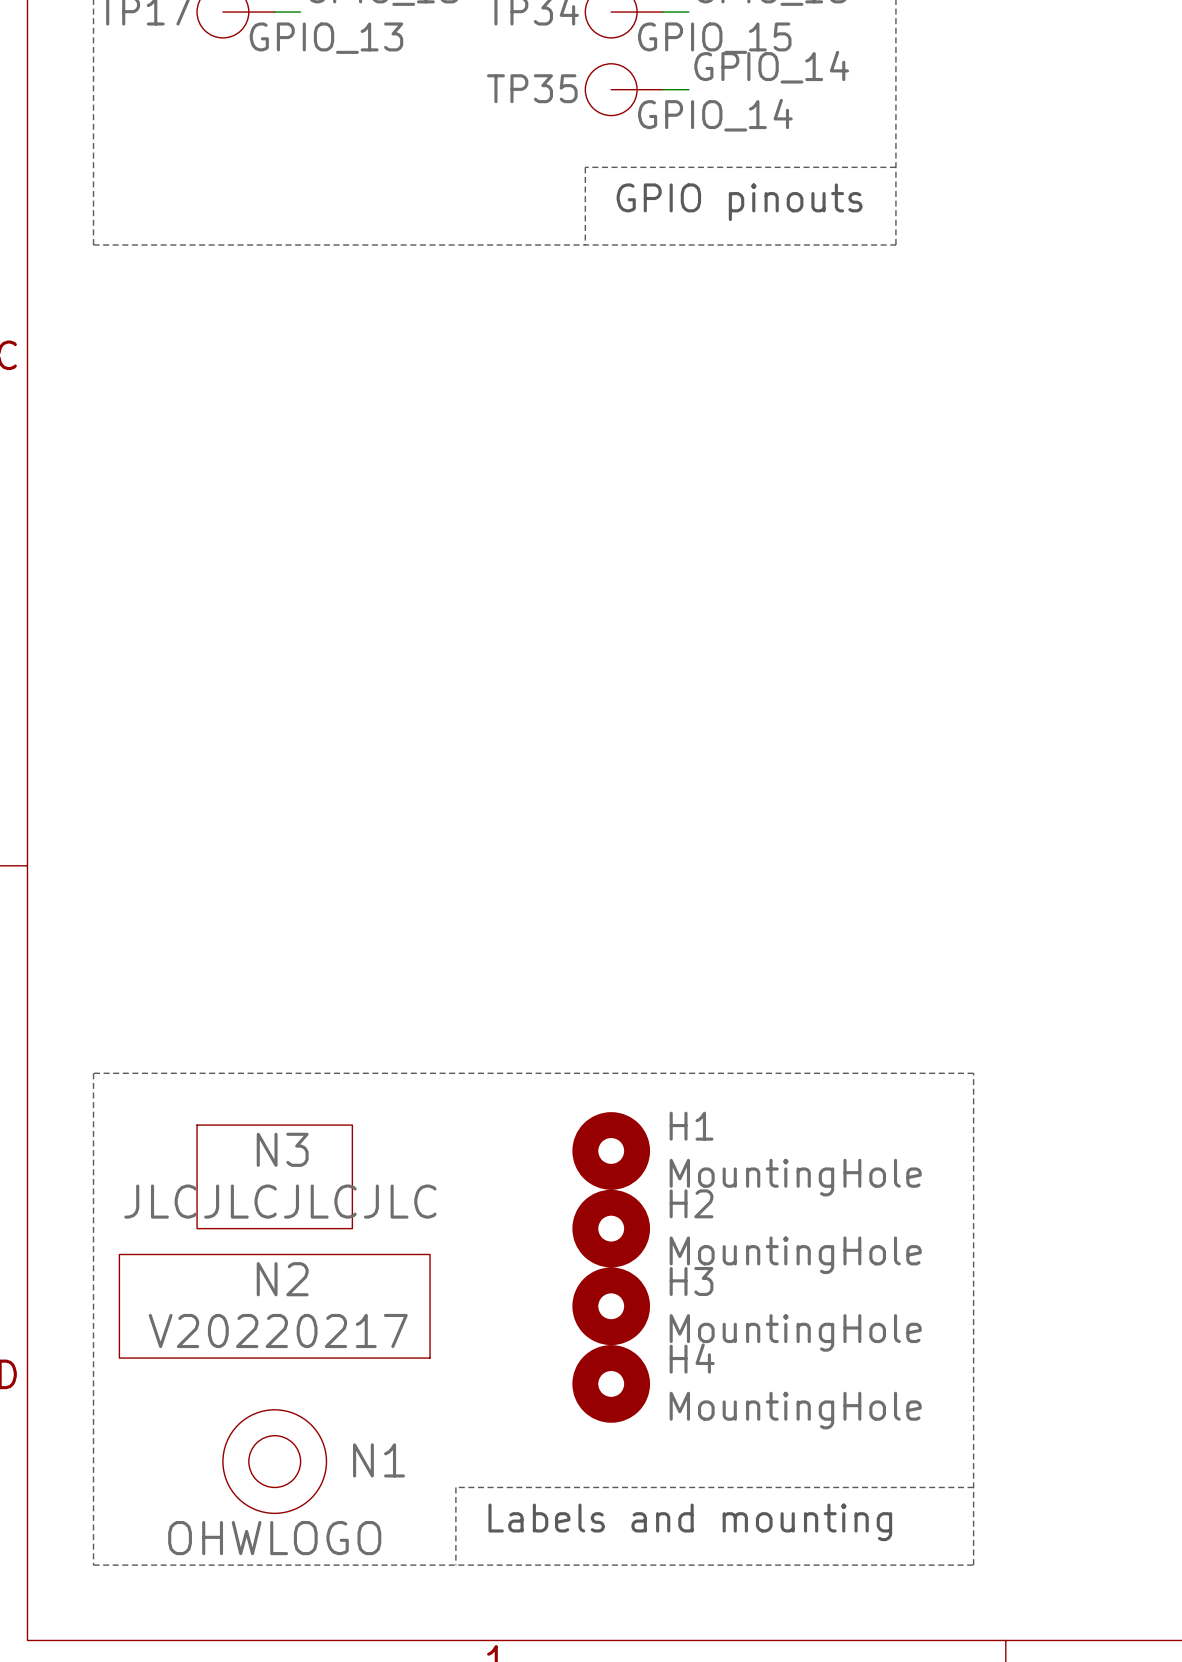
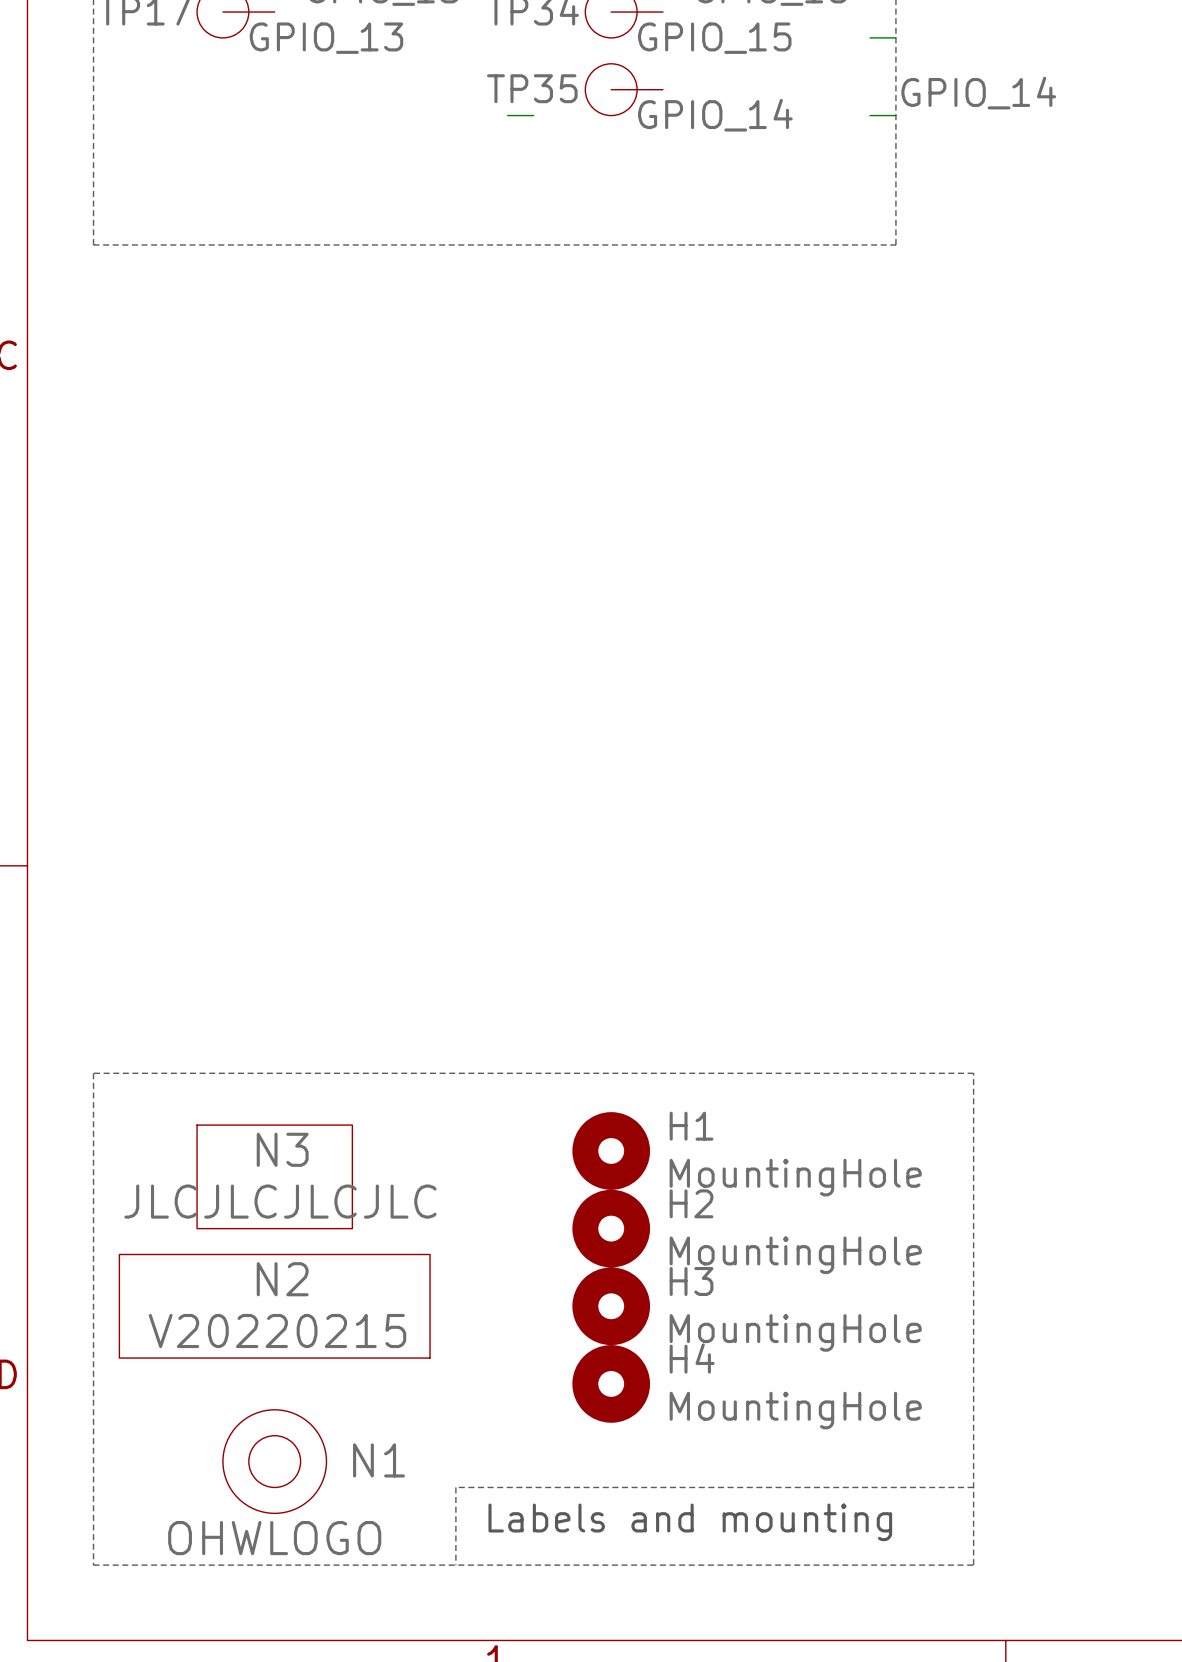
wire: (274, 12) (300, 12) -> (507, 115) (533, 115)
wire: (662, 12) (688, 12) -> (870, 37) (895, 37)
label position: GPIO_14 (771, 67) -> GPIO_14 (978, 93)
wire: (662, 89) (688, 89) -> (870, 115) (895, 115)
line: (895, 167) (585, 167) (585, 244) -> none
text: GPIO pinouts (739, 202) -> none
N2 value: V20220217 (278, 1330) -> V20220215 (277, 1330)

